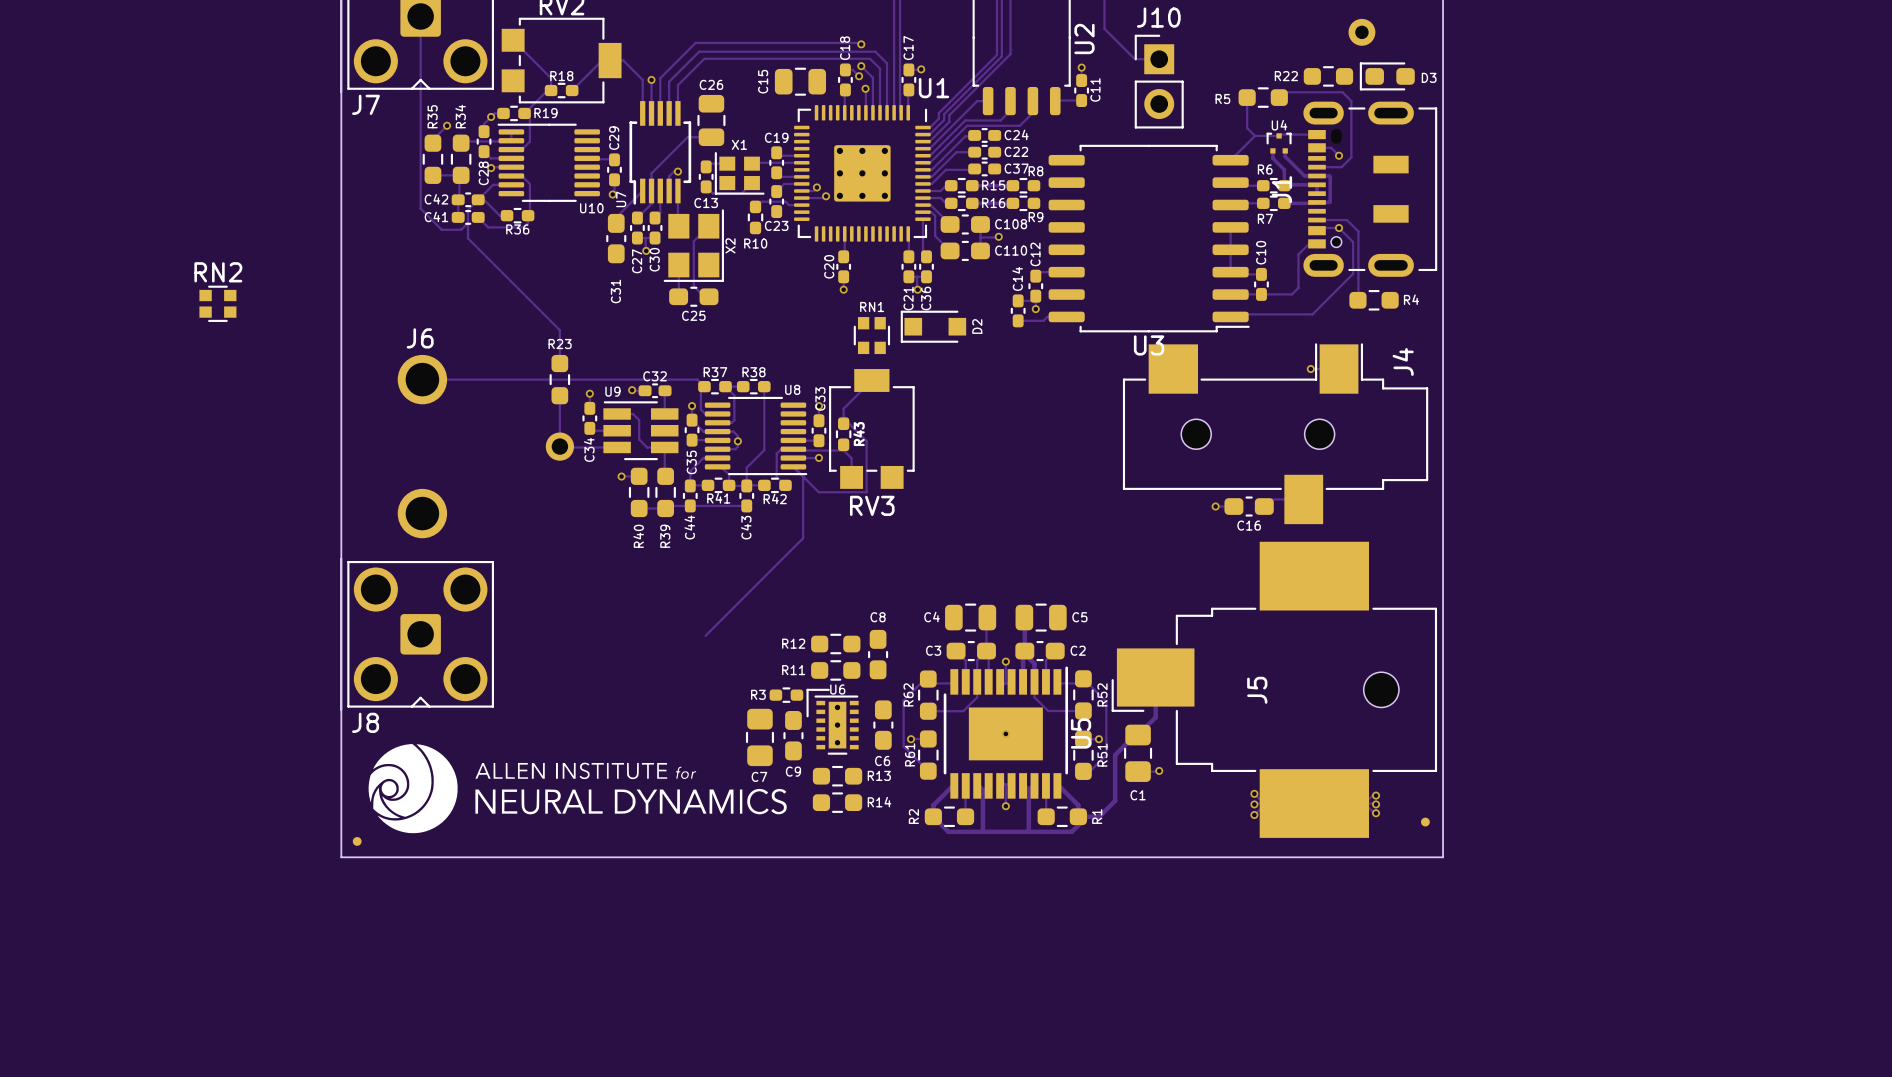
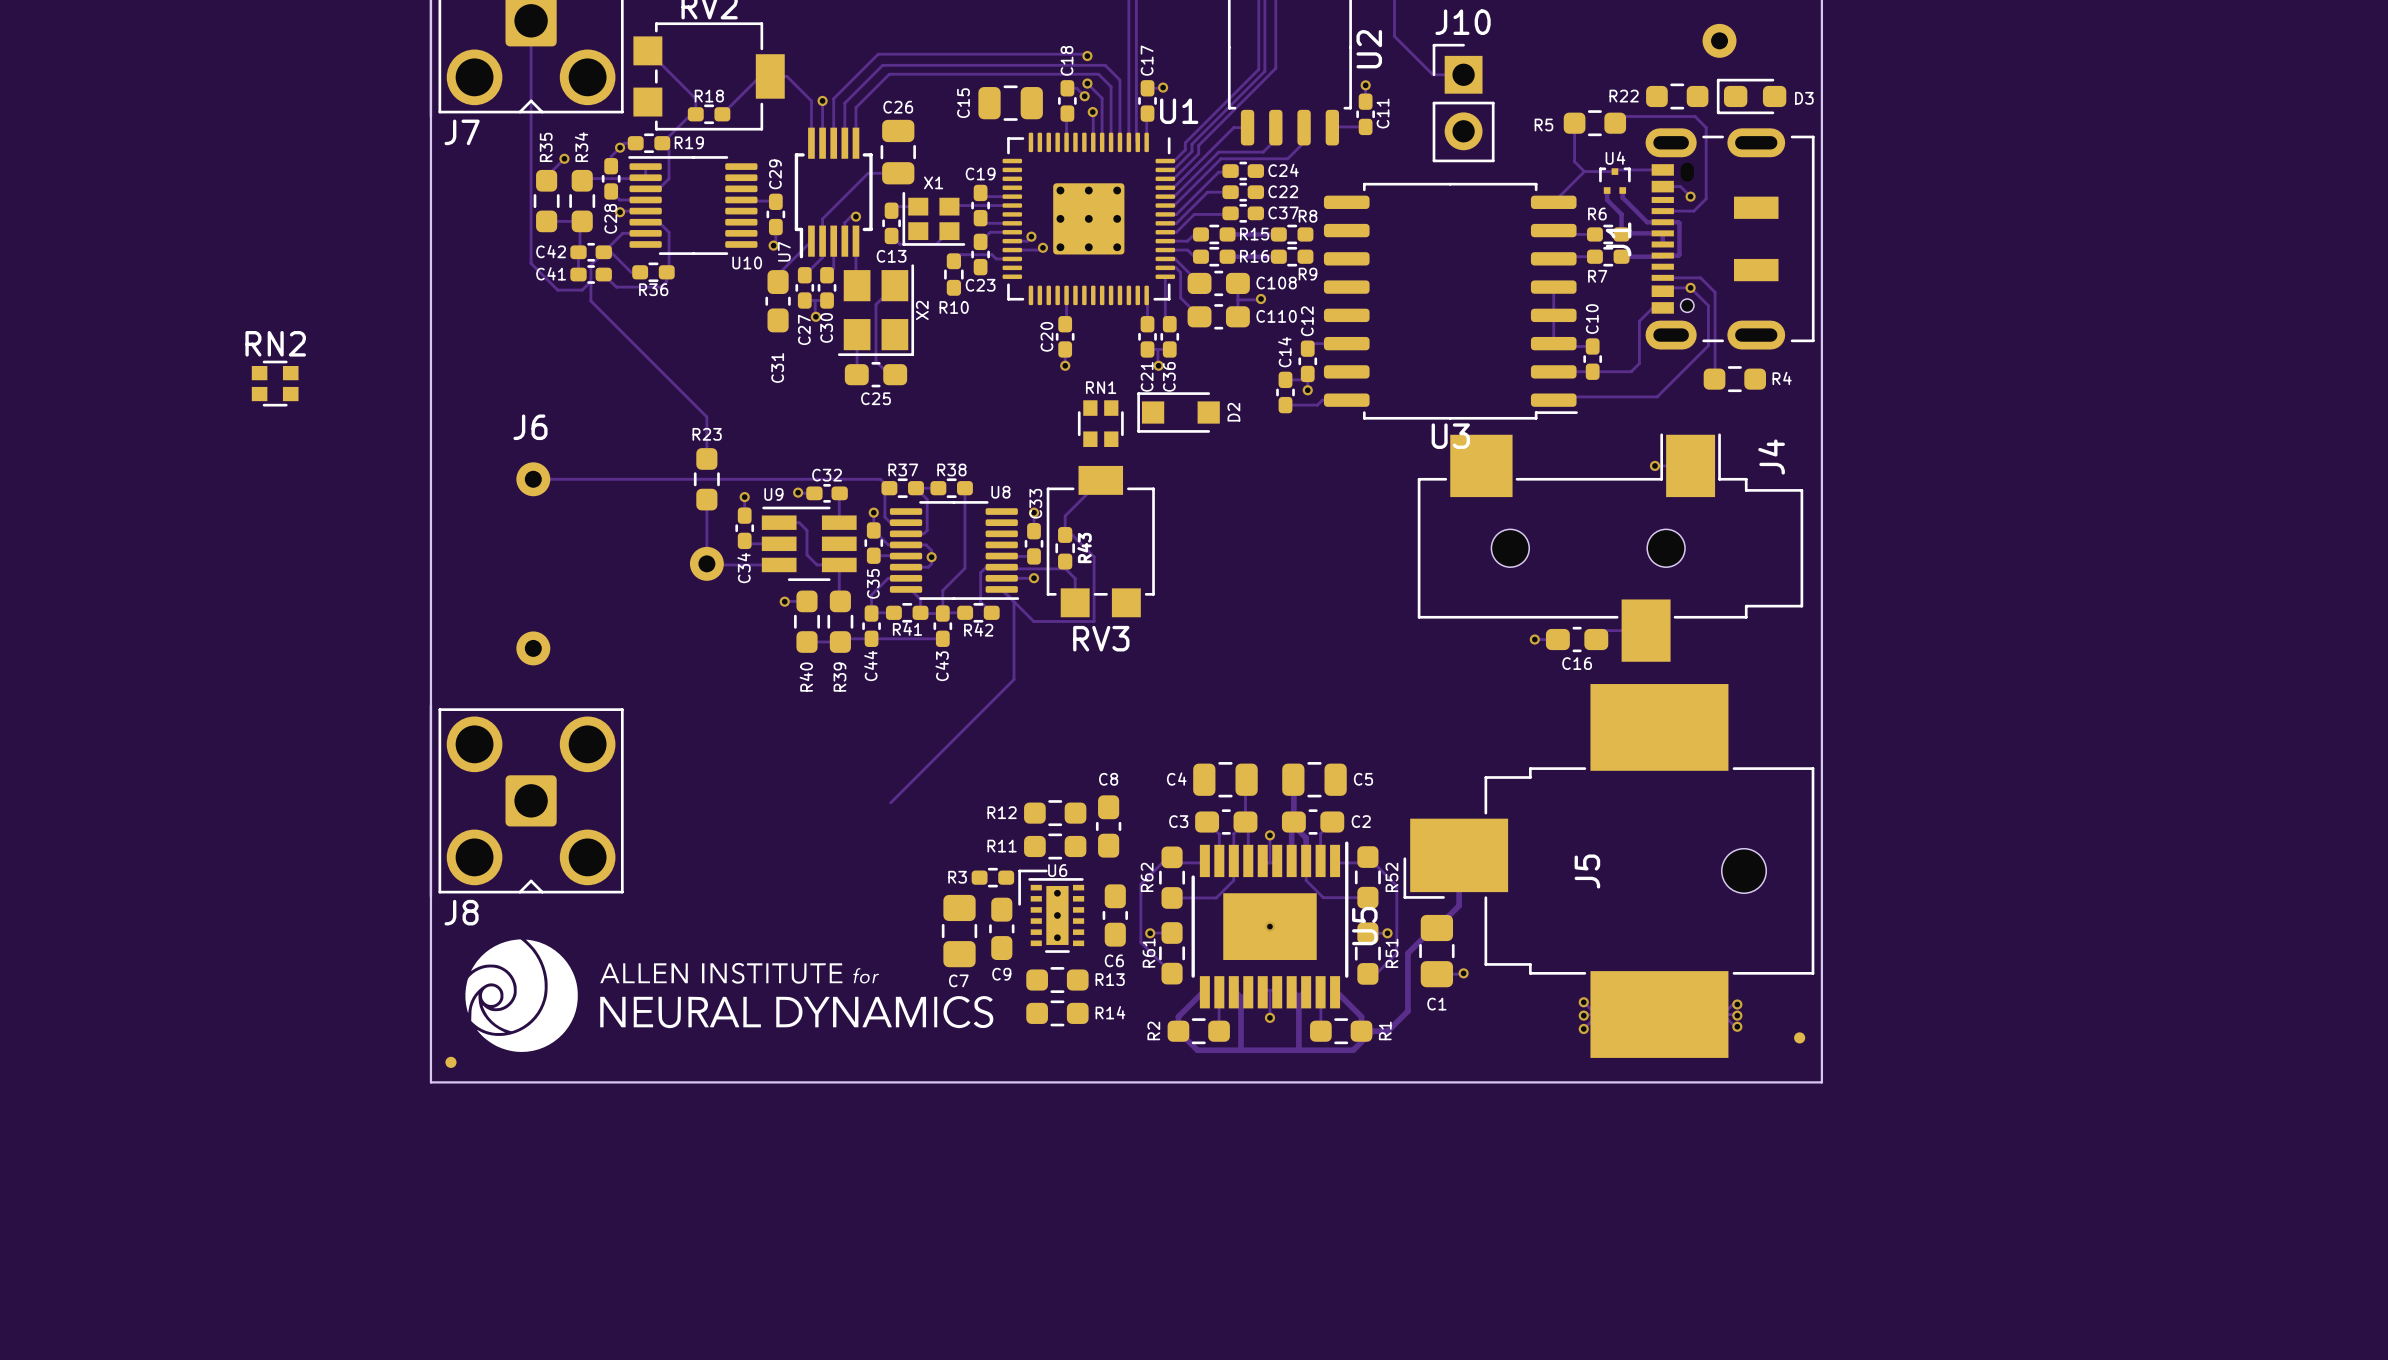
J6 footprint: [397, 354, 575, 539] -> [516, 462, 724, 666]

